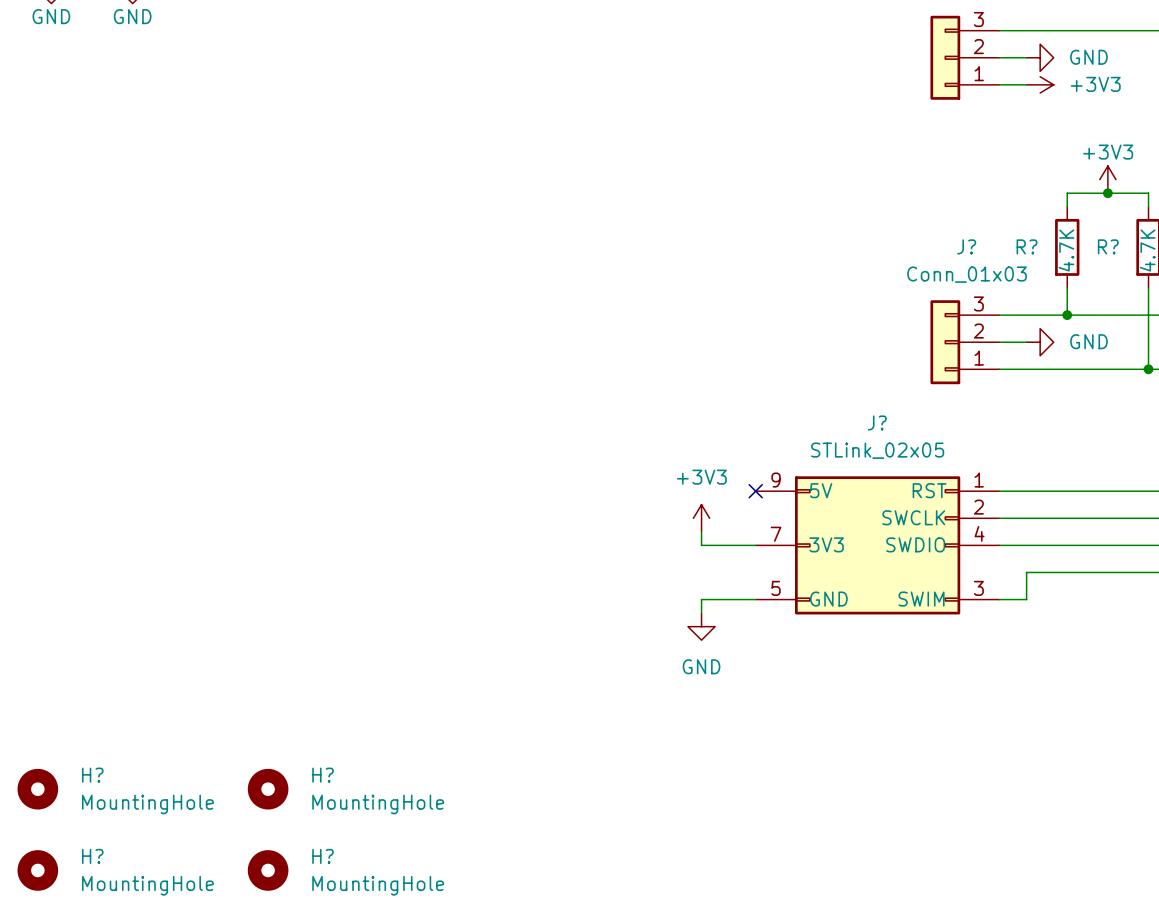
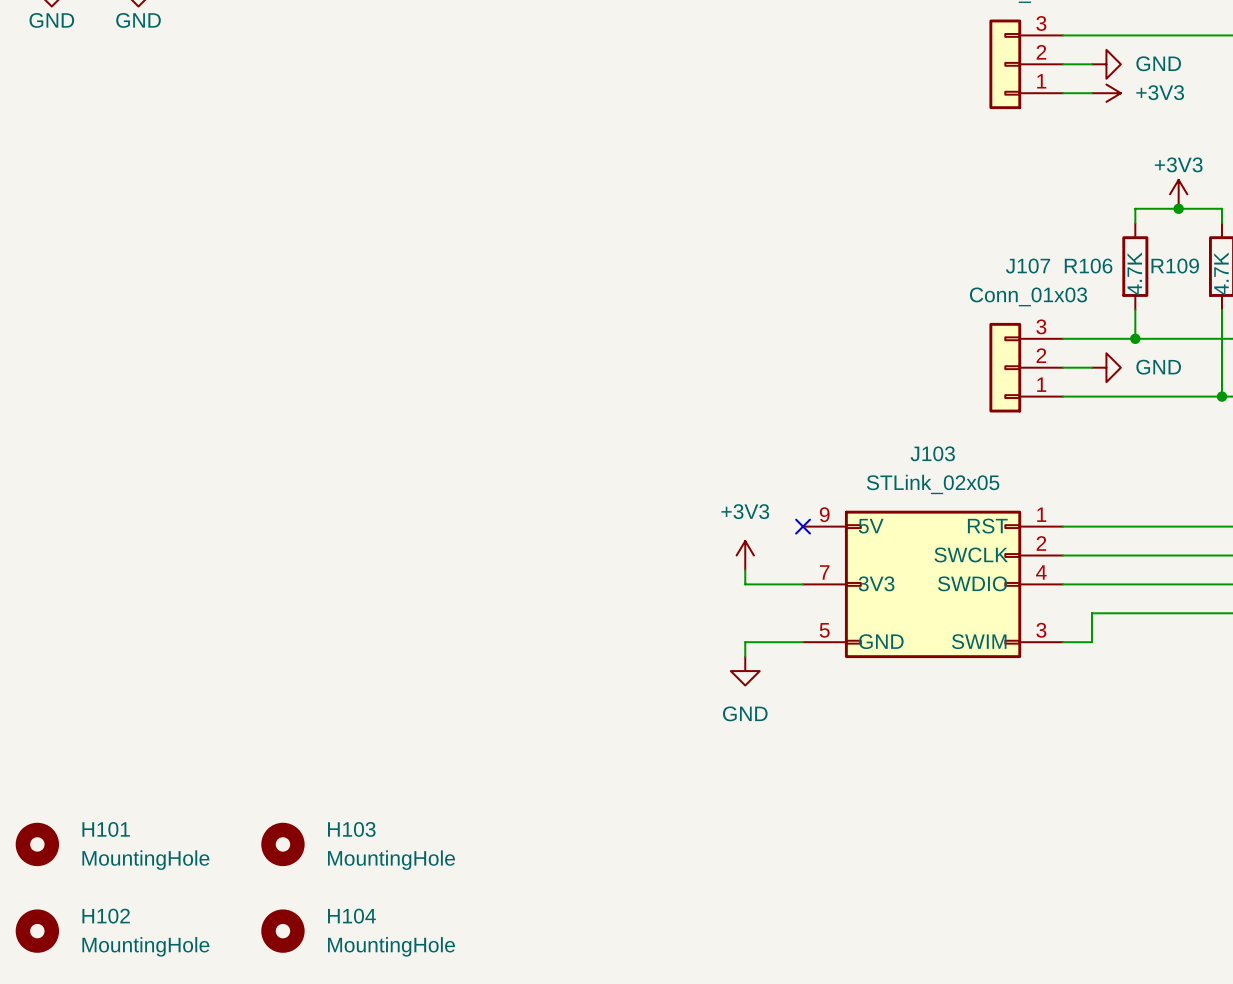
J? name: J? (966, 246) -> J107 (1028, 266)
R? name: R? (1027, 246) -> R106 (1088, 266)
R? name: R? (1108, 246) -> R109 (1175, 266)
J? name: J? (877, 422) -> J103 (932, 453)
H? name: H? (92, 775) -> H101 (106, 829)
H? name: H? (323, 775) -> H103 (351, 829)
H? name: H? (92, 856) -> H102 (106, 916)
H? name: H? (323, 856) -> H104 (351, 916)

